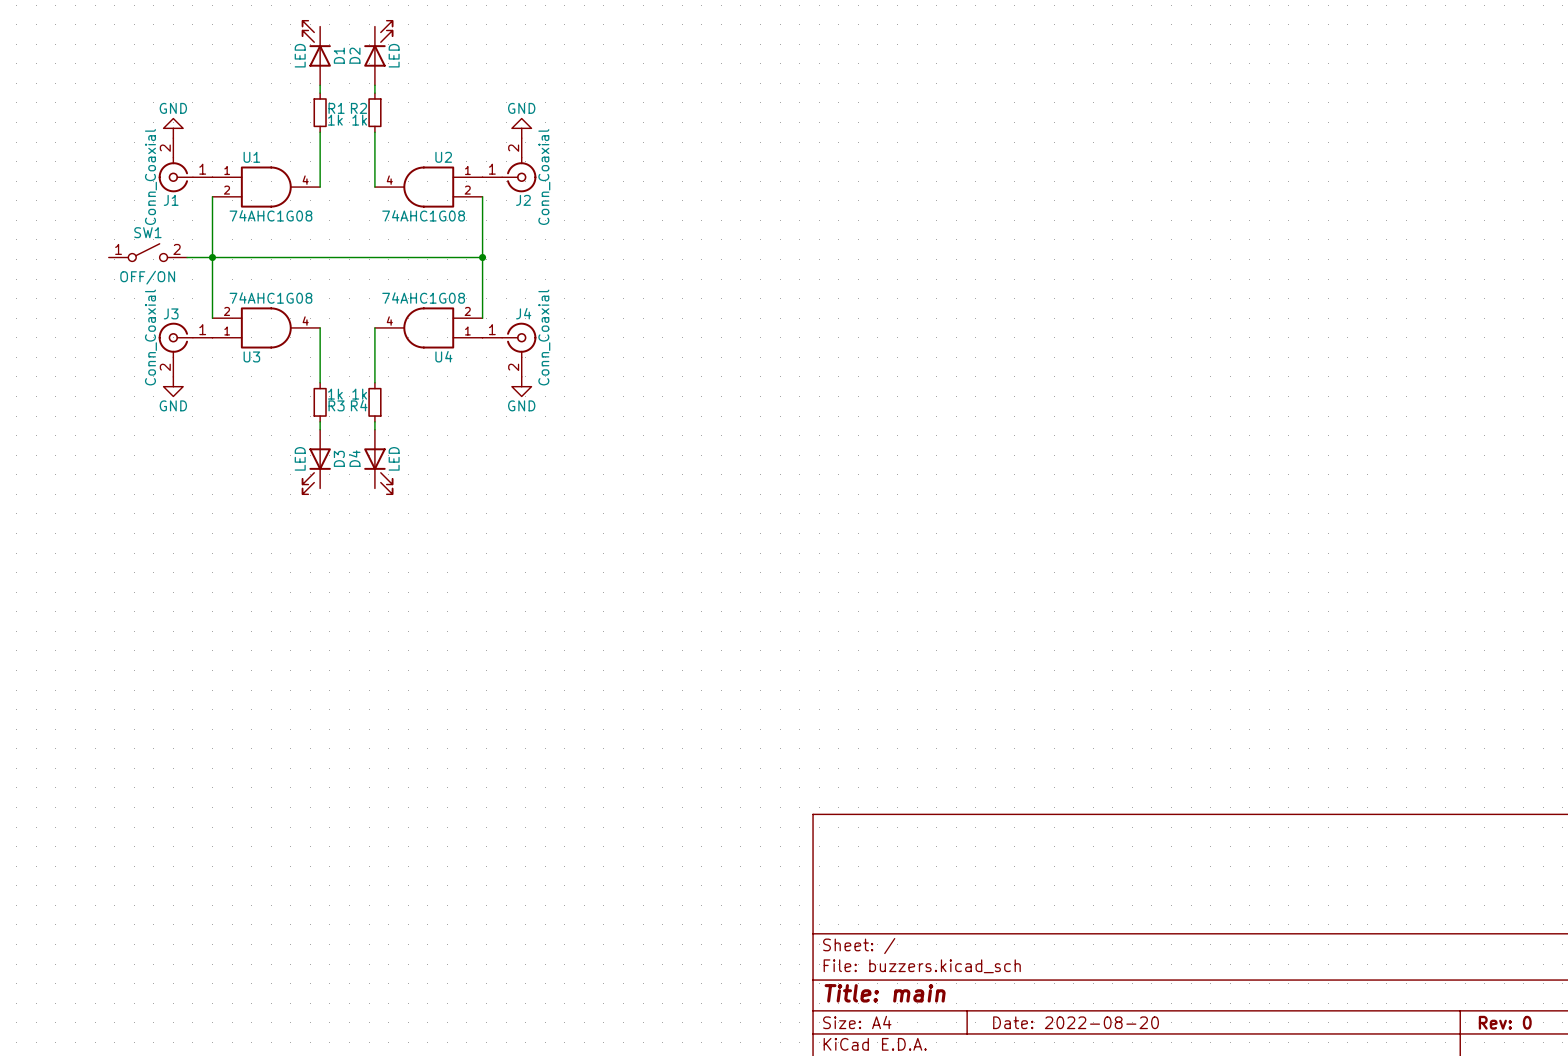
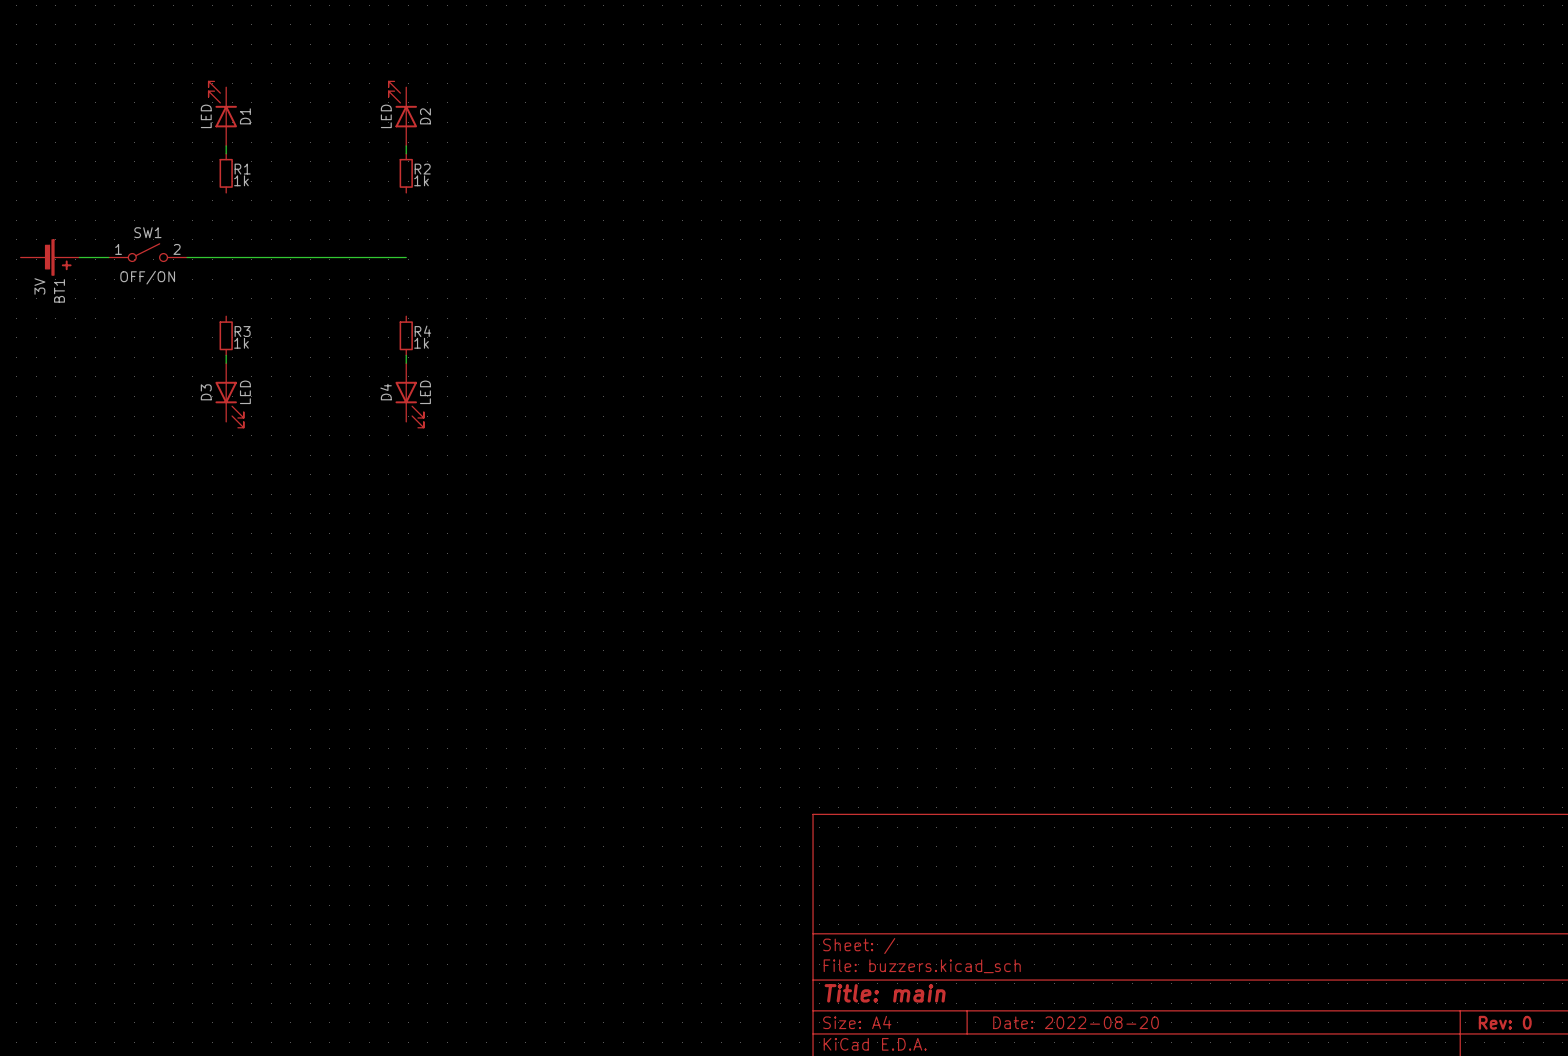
D2 flip: as is (378, 43) -> left-right (402, 104)
D1 position: (316, 52) -> (222, 113)
D2 position: (378, 52) -> (402, 113)
wire: (320, 85) (320, 93) -> (226, 145) (226, 153)
wire: (374, 85) (374, 93) -> (406, 145) (406, 153)
R2 name position: R2 (358, 108) -> R2 (422, 169)
R1 position: (320, 112) -> (226, 173)
R2 position: (374, 112) -> (406, 173)
R2 value position: 1k (359, 120) -> 1k (421, 180)
power symbol: GND (173, 128) -> none
power symbol: GND (521, 128) -> none
wire: (320, 132) (320, 187) -> none
wire: (374, 132) (374, 187) -> none
J1: Conn_Coaxial (185, 165) -> none
J2: Conn_Coaxial (509, 165) -> none
U1: 74AHC1G08 (266, 187) -> none
U2: 74AHC1G08 (428, 187) -> none
wire: (212, 196) (212, 318) -> none
wire: (482, 196) (482, 318) -> none
BT1: none -> 3V (50, 257)
wire: none -> (79, 257) (108, 257)
junction: (212, 257) -> none
wire: (406, 257) (482, 257) -> none
junction: (482, 257) -> none
U3: 74AHC1G08 (266, 327) -> none
wire: (320, 327) (320, 382) -> none
wire: (374, 327) (374, 382) -> none
U4: 74AHC1G08 (428, 327) -> none
J3: Conn_Coaxial (185, 349) -> none
J4: Conn_Coaxial (509, 349) -> none
power symbol: GND (173, 386) -> none
power symbol: GND (521, 386) -> none
R3 value position: 1k (335, 394) -> 1k (241, 343)
R4 value position: 1k (359, 394) -> 1k (421, 343)
R3 position: (320, 402) -> (226, 335)
R4 position: (374, 402) -> (406, 335)
R3 name position: R3 (336, 405) -> R3 (242, 331)
R4 name position: R4 (359, 405) -> R4 (422, 331)
wire: (320, 421) (320, 429) -> (226, 355) (226, 363)
wire: (374, 421) (374, 429) -> (406, 355) (406, 363)
D3 position: (316, 462) -> (229, 395)
D4 position: (378, 462) -> (409, 395)
D3 flip: as is (316, 471) -> left-right (229, 404)

